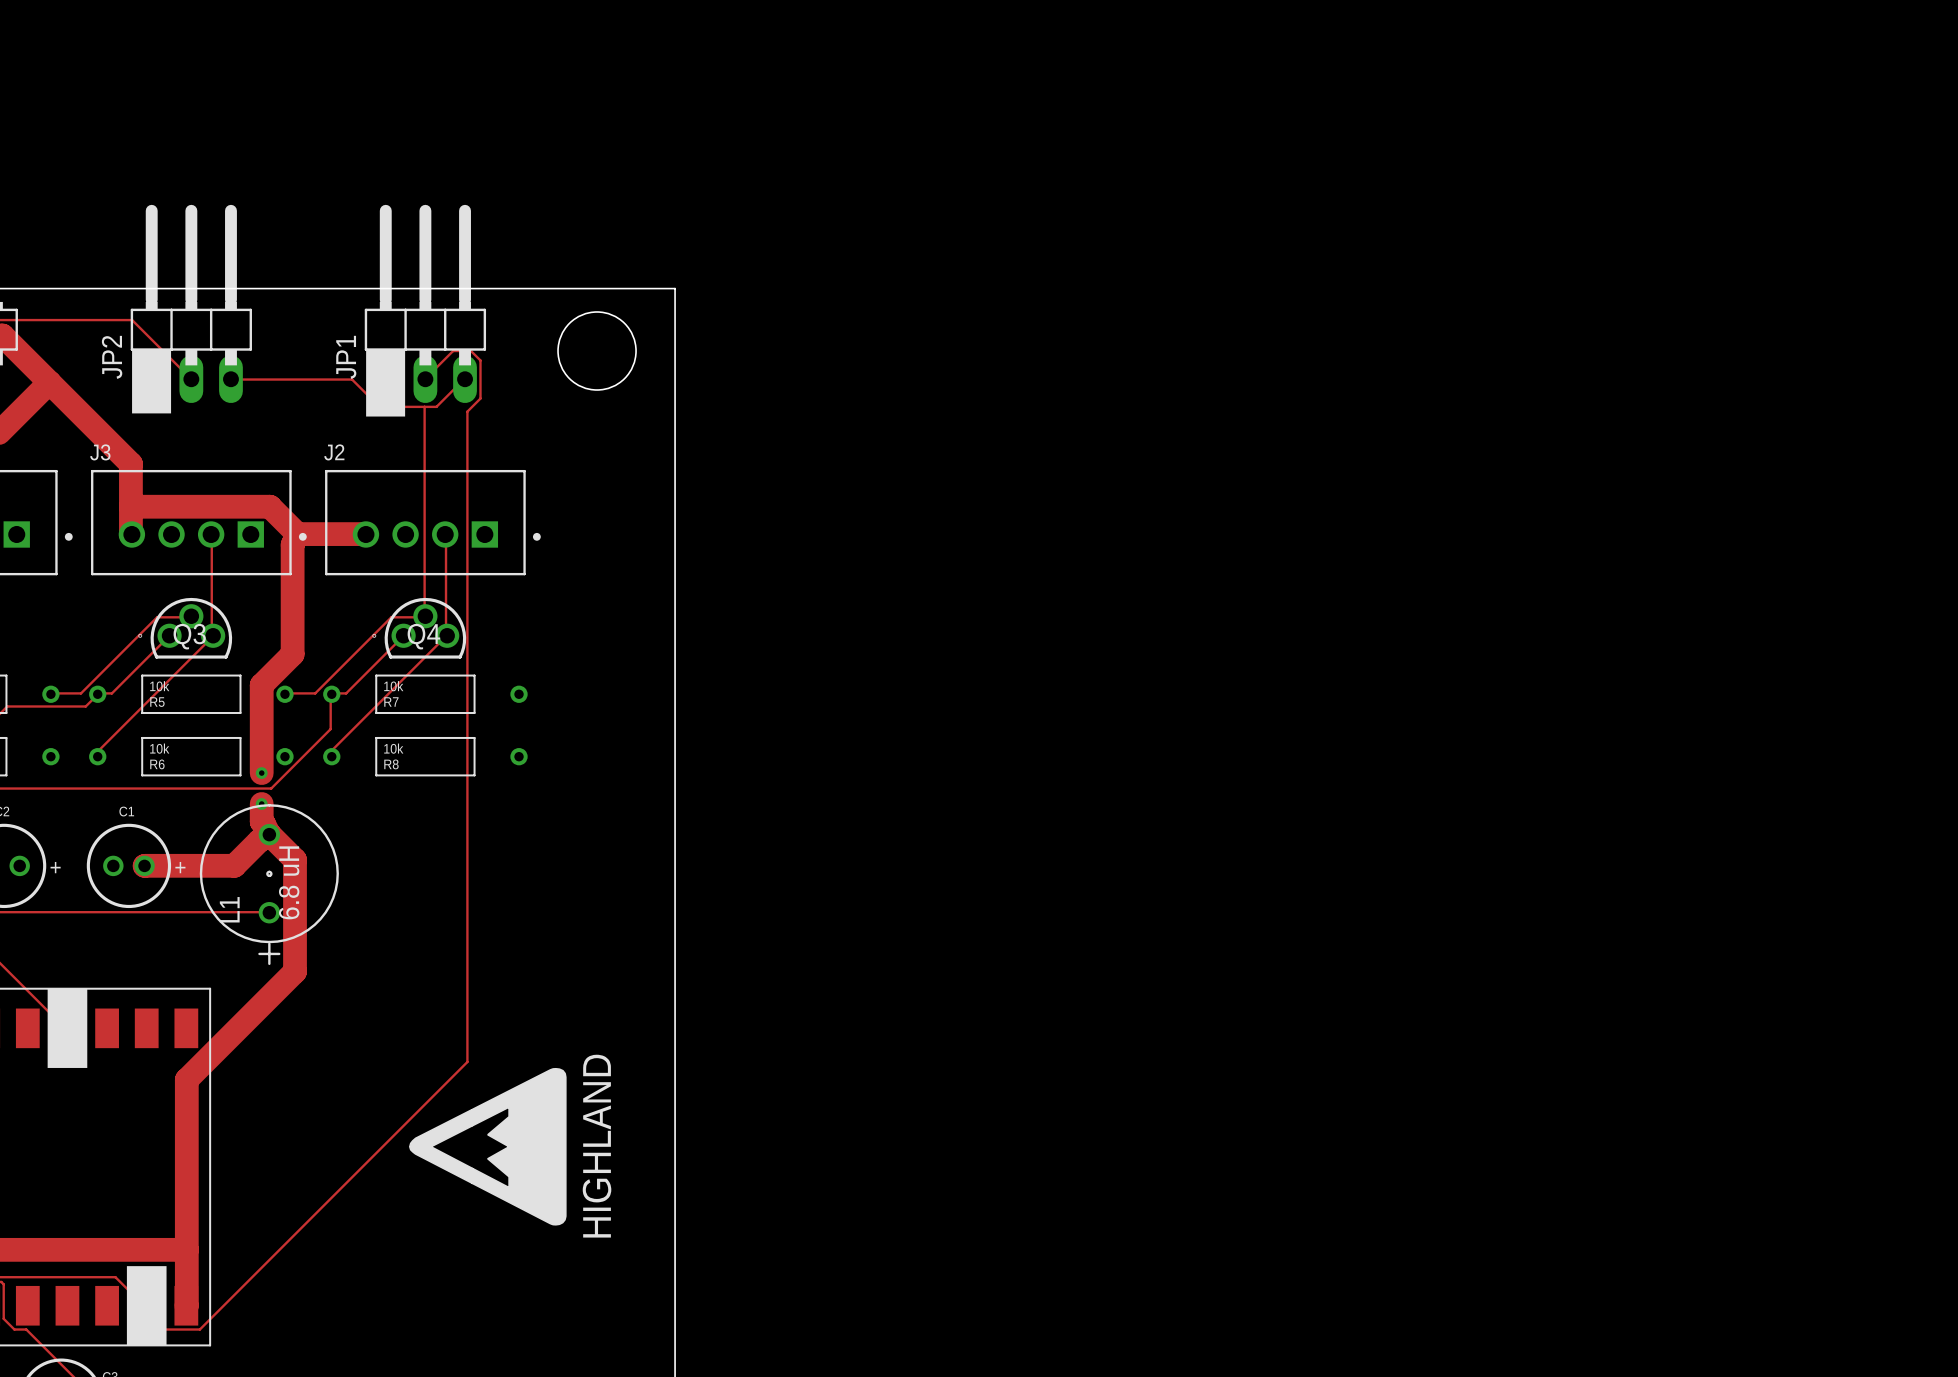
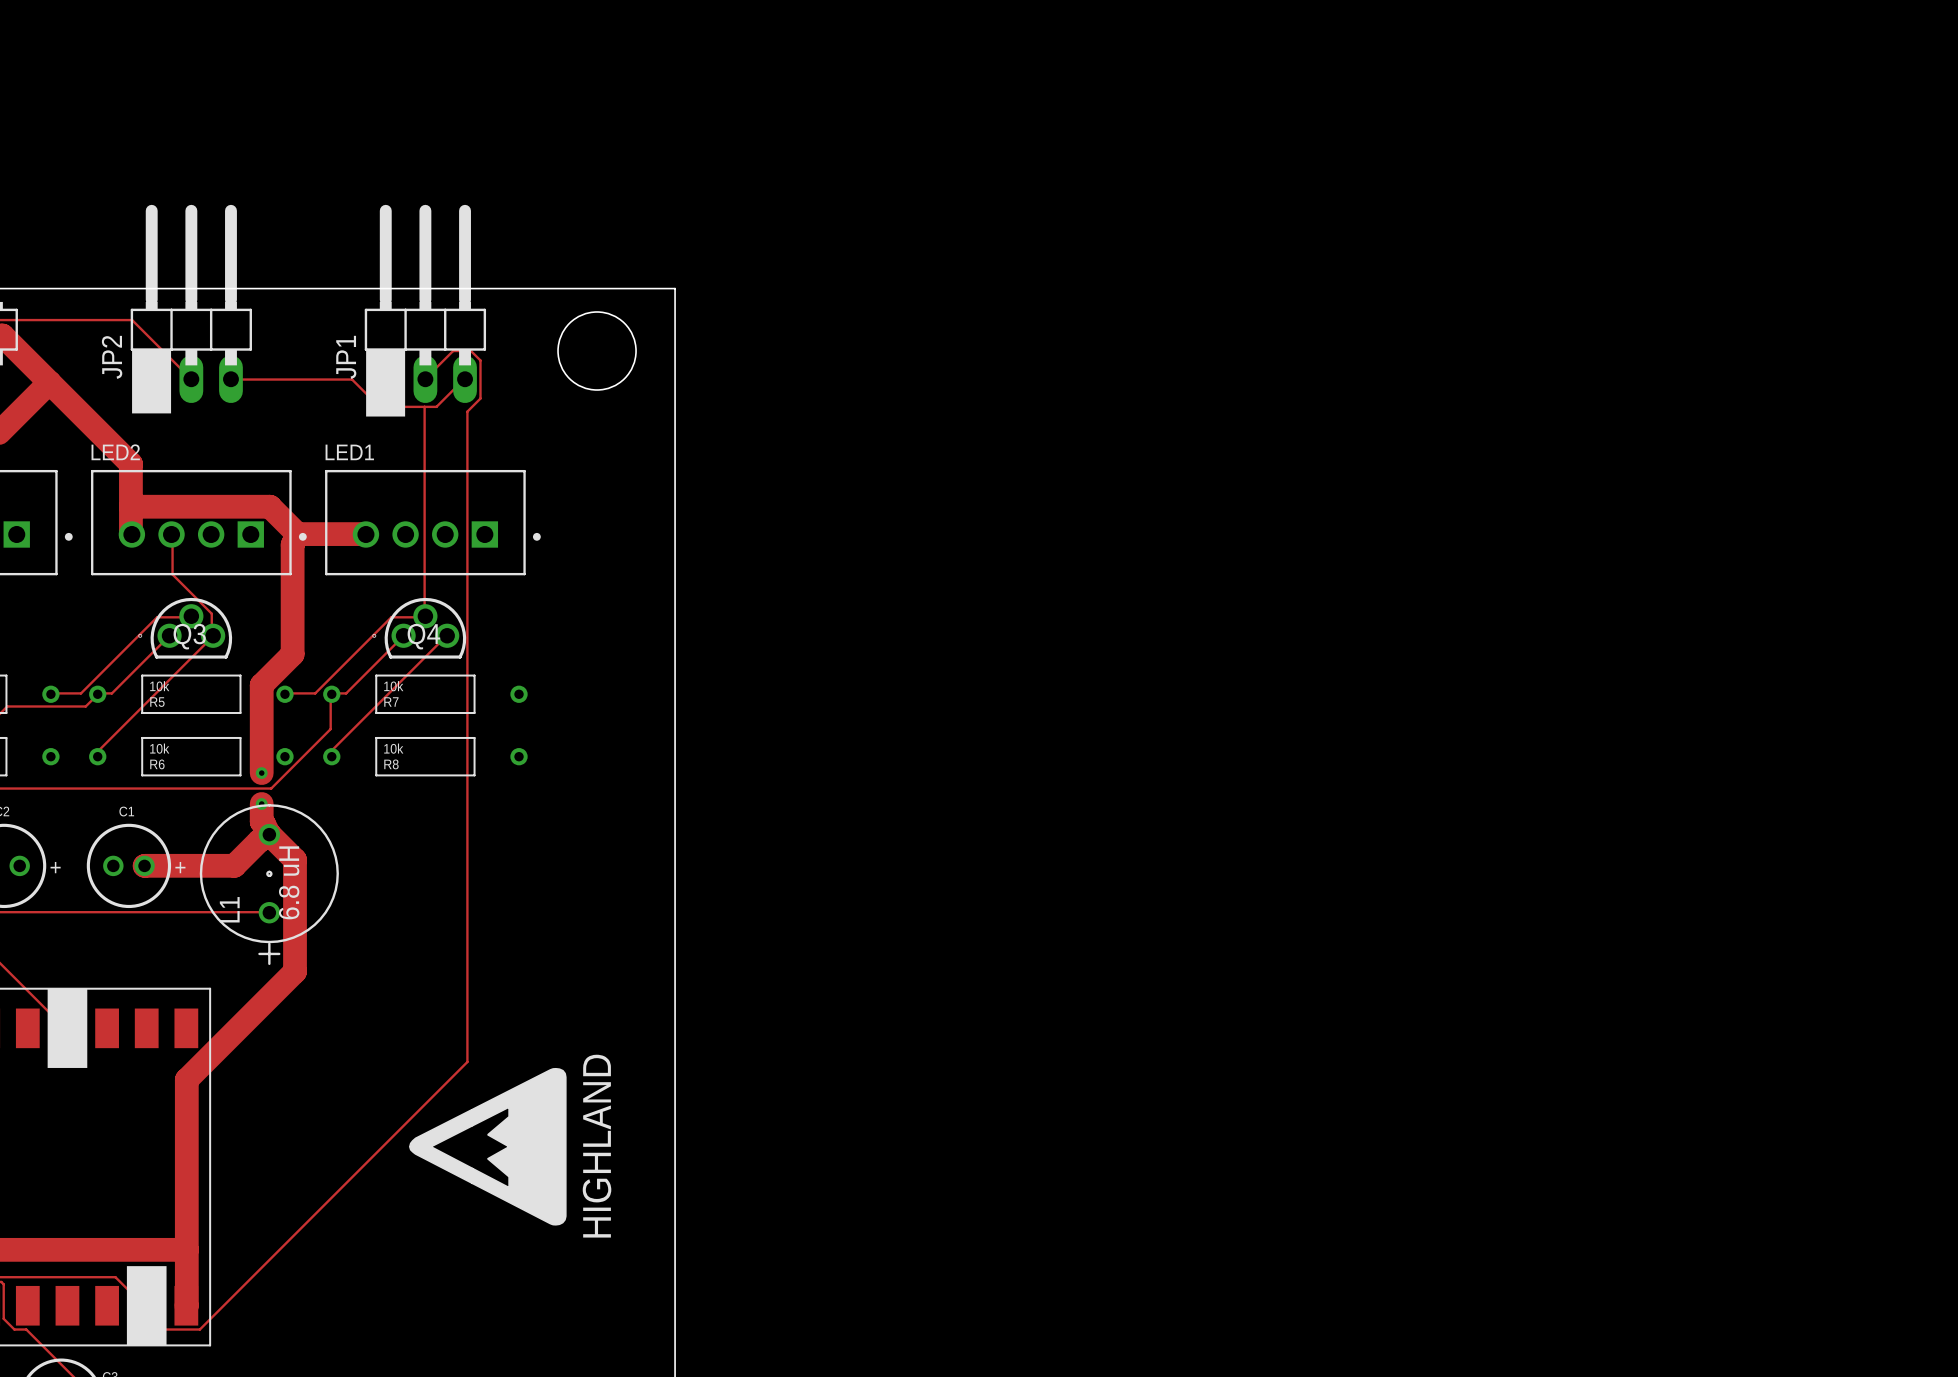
J3 name: J3 (100, 452) -> LED2 (115, 452)
J2 name: J2 (334, 452) -> LED1 (349, 452)
track: (211, 534) (211, 613) -> (171, 534) (172, 574) (211, 613)
track: (445, 534) (446, 635) -> none

